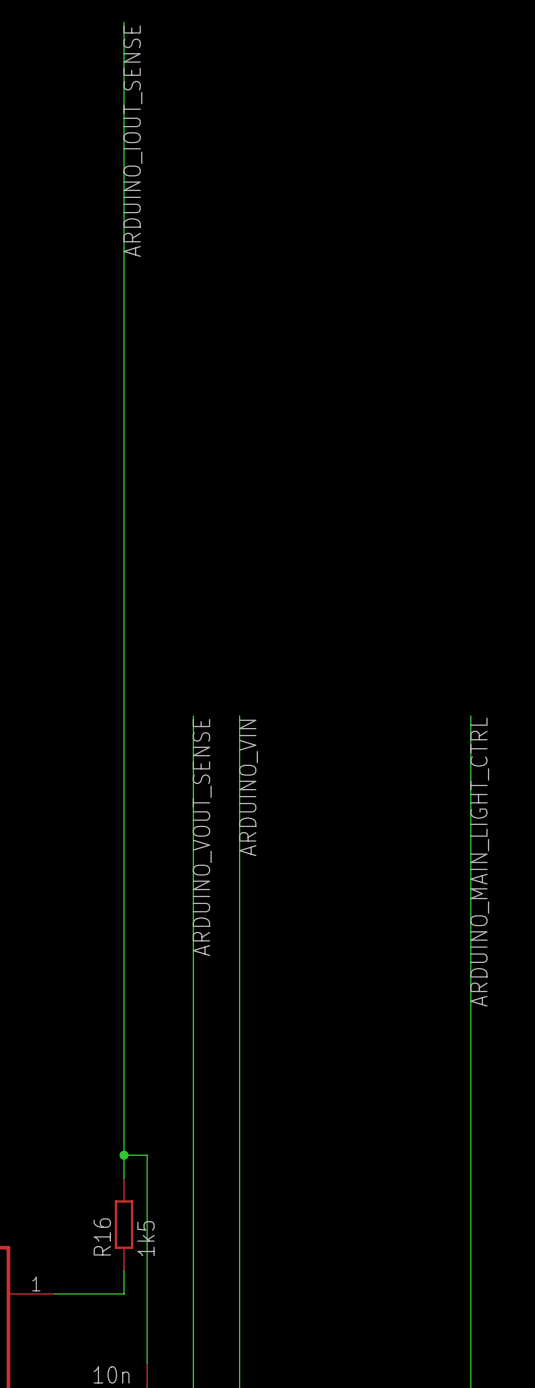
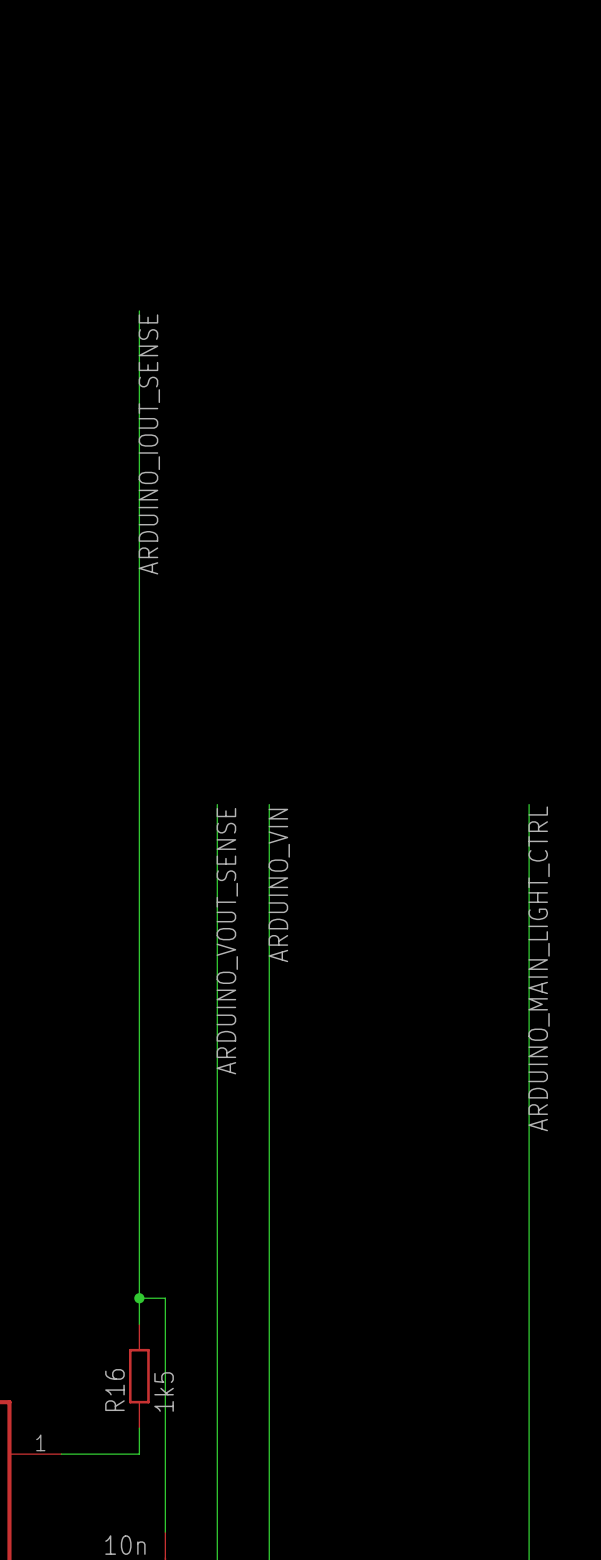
wire: (124, 22) (124, 276) -> none
label: ARDUINO_IOUT_SENSE (132, 141) -> none
label: none -> ARDUINO_IOUT_SENSE (149, 444)

